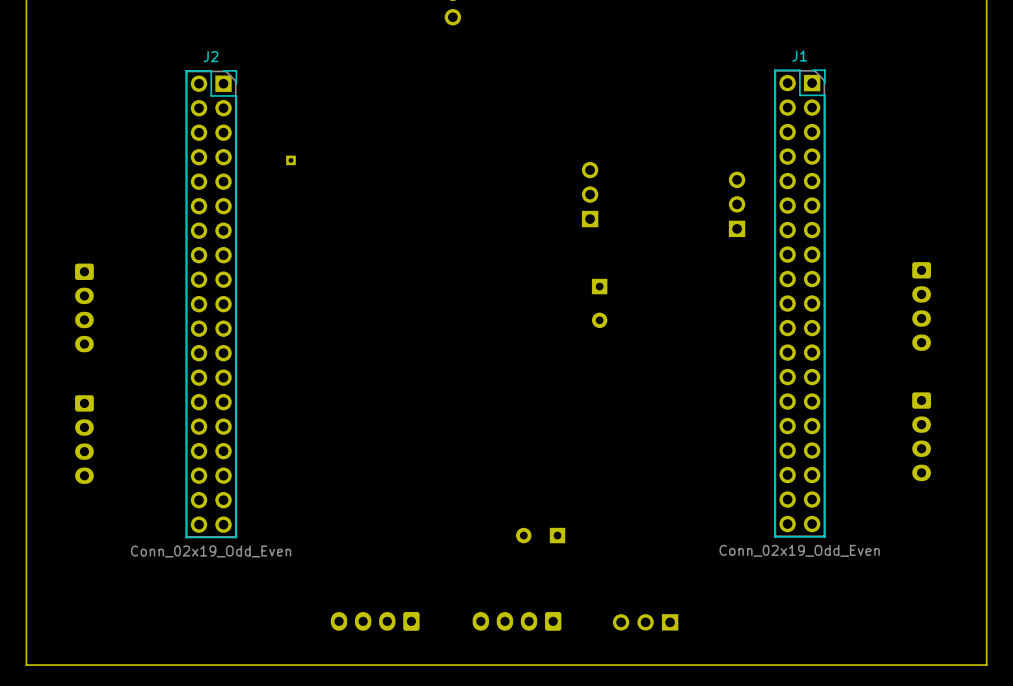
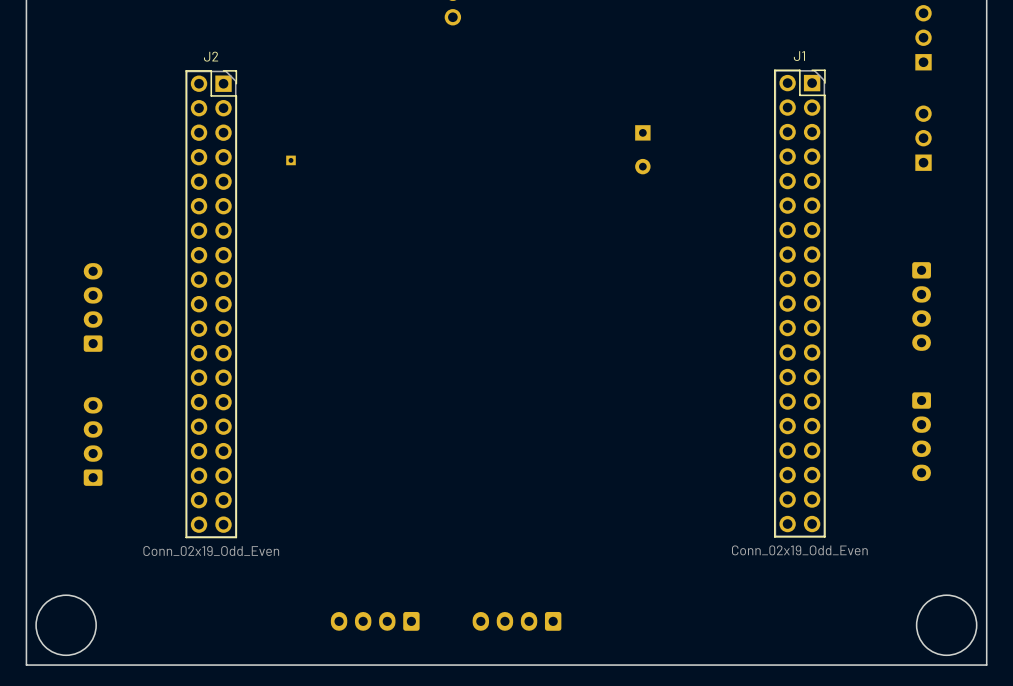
part: none -> (923, 37)
part: none -> (923, 138)
part: (590, 194) -> none
part: (737, 204) -> none
part position: (599, 303) -> (642, 149)
part rotation: 0° (84, 307) -> 180° (93, 307)
part rotation: 0° (84, 439) -> 180° (93, 441)
part: (540, 535) -> none
round board edge: none -> [35, 594, 97, 656]
round board edge: none -> [916, 594, 978, 656]
part: (645, 622) -> none

